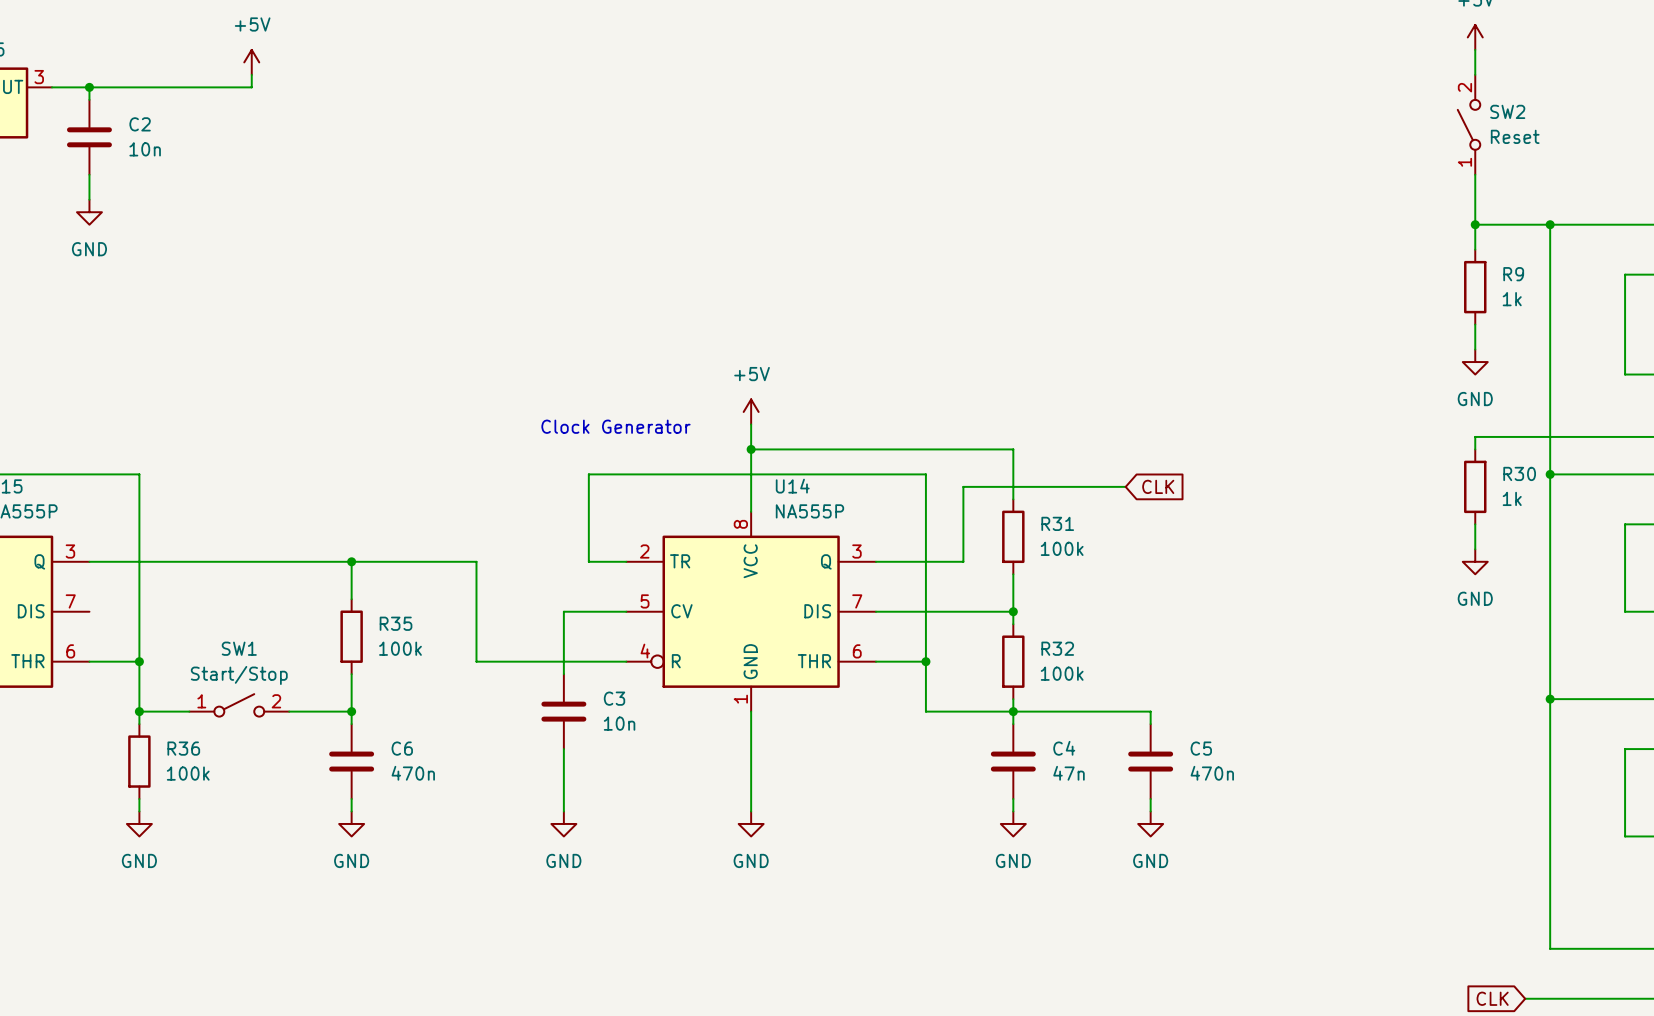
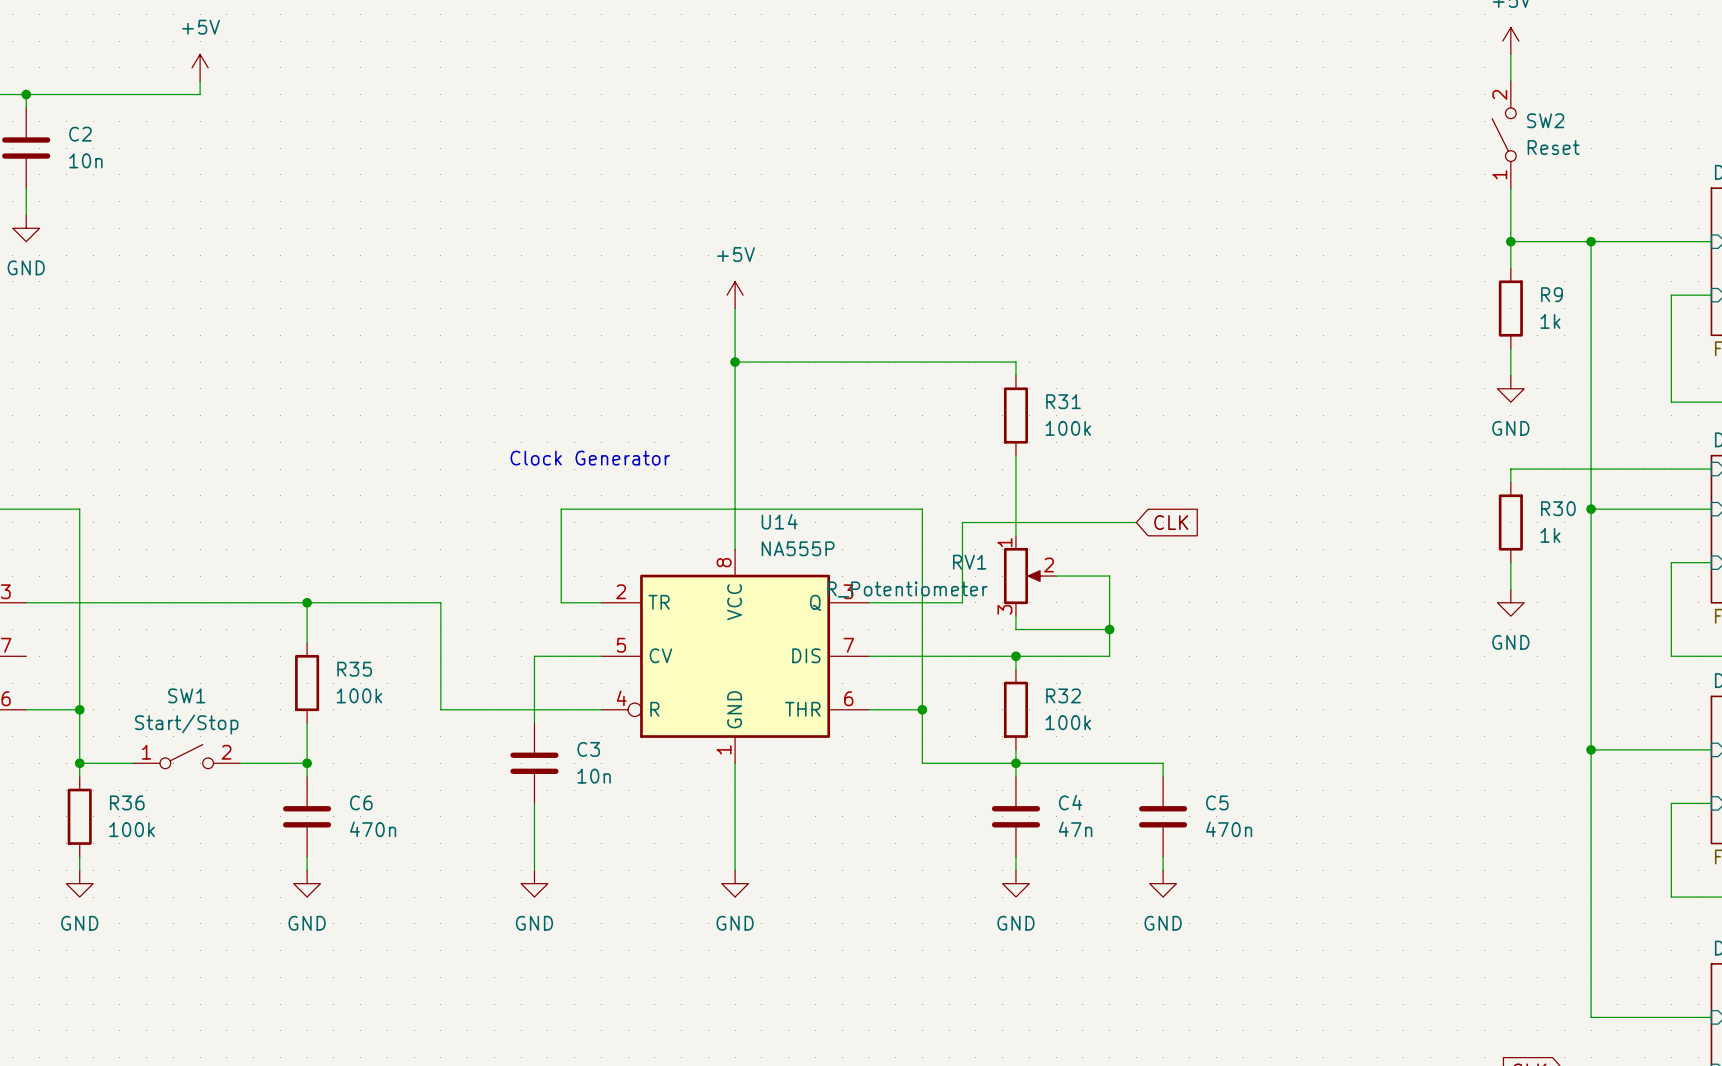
wire: none -> (735, 308) (735, 455)
wire: none -> (735, 362) (1015, 362) (1015, 375)
junction: none -> (735, 362)
power symbol position: +5V (751, 411) -> +5V (735, 295)
wire: (751, 449) (1013, 449) -> (1015, 455) (1015, 482)
junction: (751, 449) -> none
R31 position: (1013, 536) -> (1015, 415)
RV1: none -> R_Potentiometer (1030, 576)
wire: (1013, 586) (1013, 611) -> (1056, 576) (1109, 576) (1109, 656) (1015, 656)
wire: none -> (1015, 629) (1109, 629)
junction: none -> (1109, 629)

